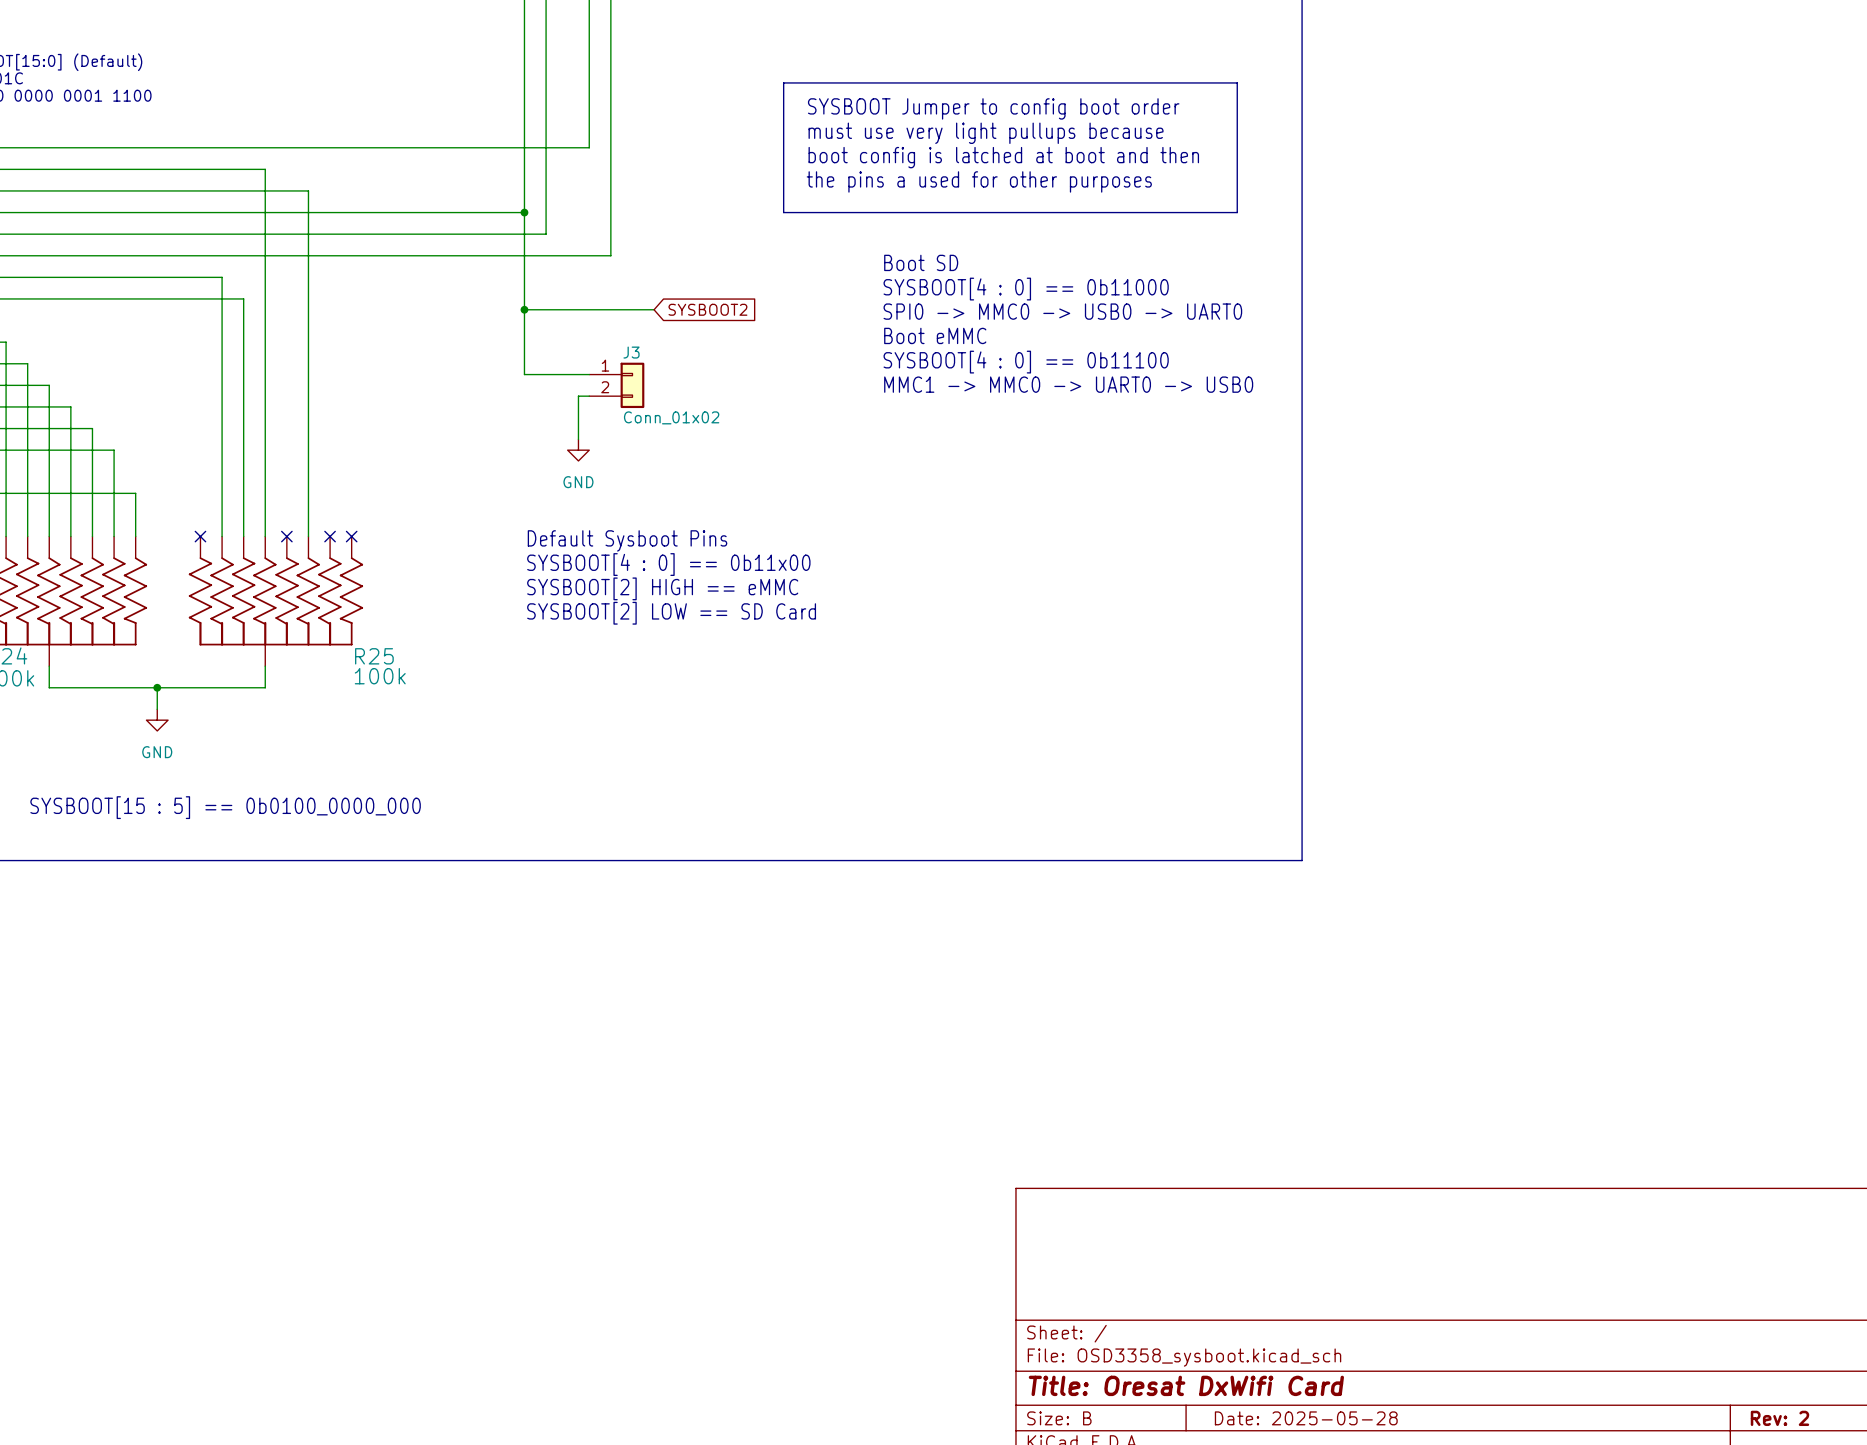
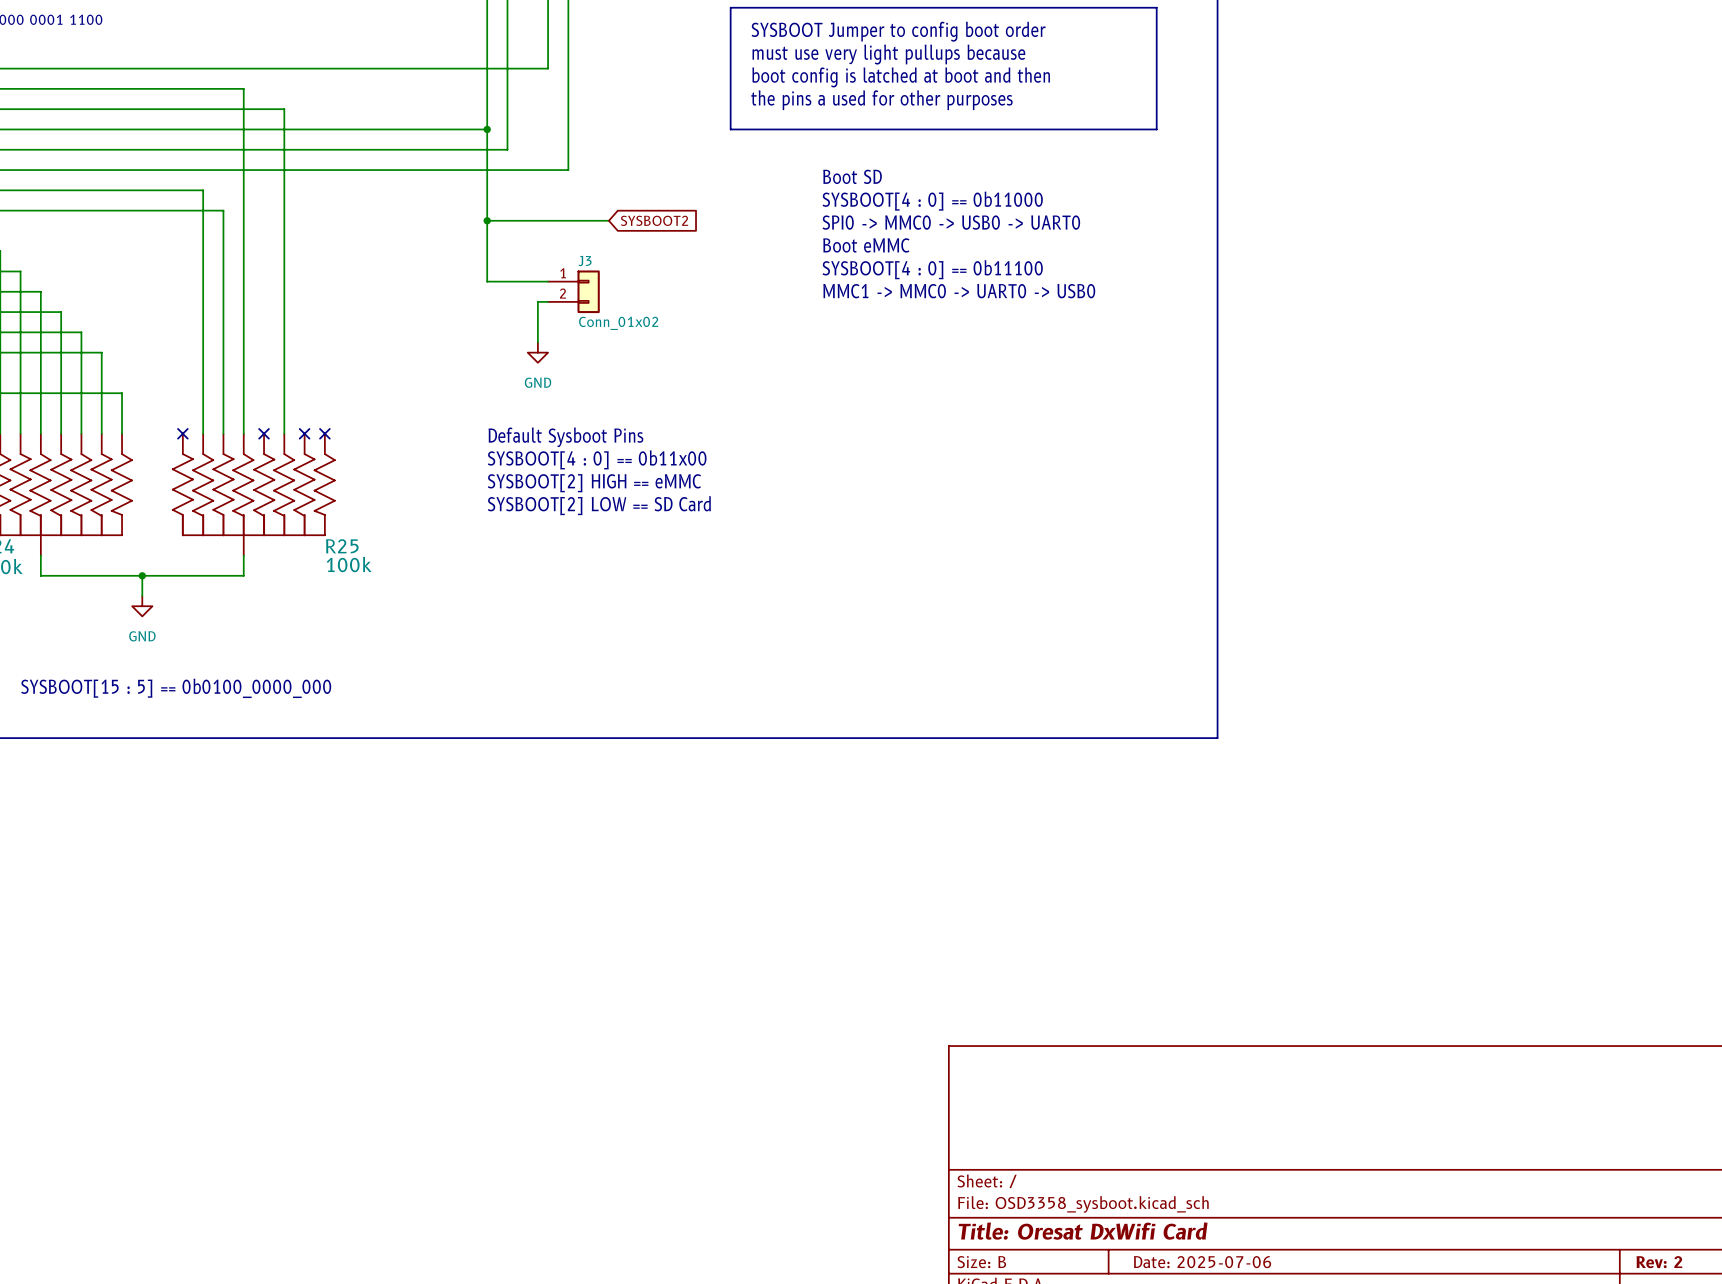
title block: Date: 2025-05-28 (1306, 1418) -> Date: 2025-07-06 (1202, 1262)

